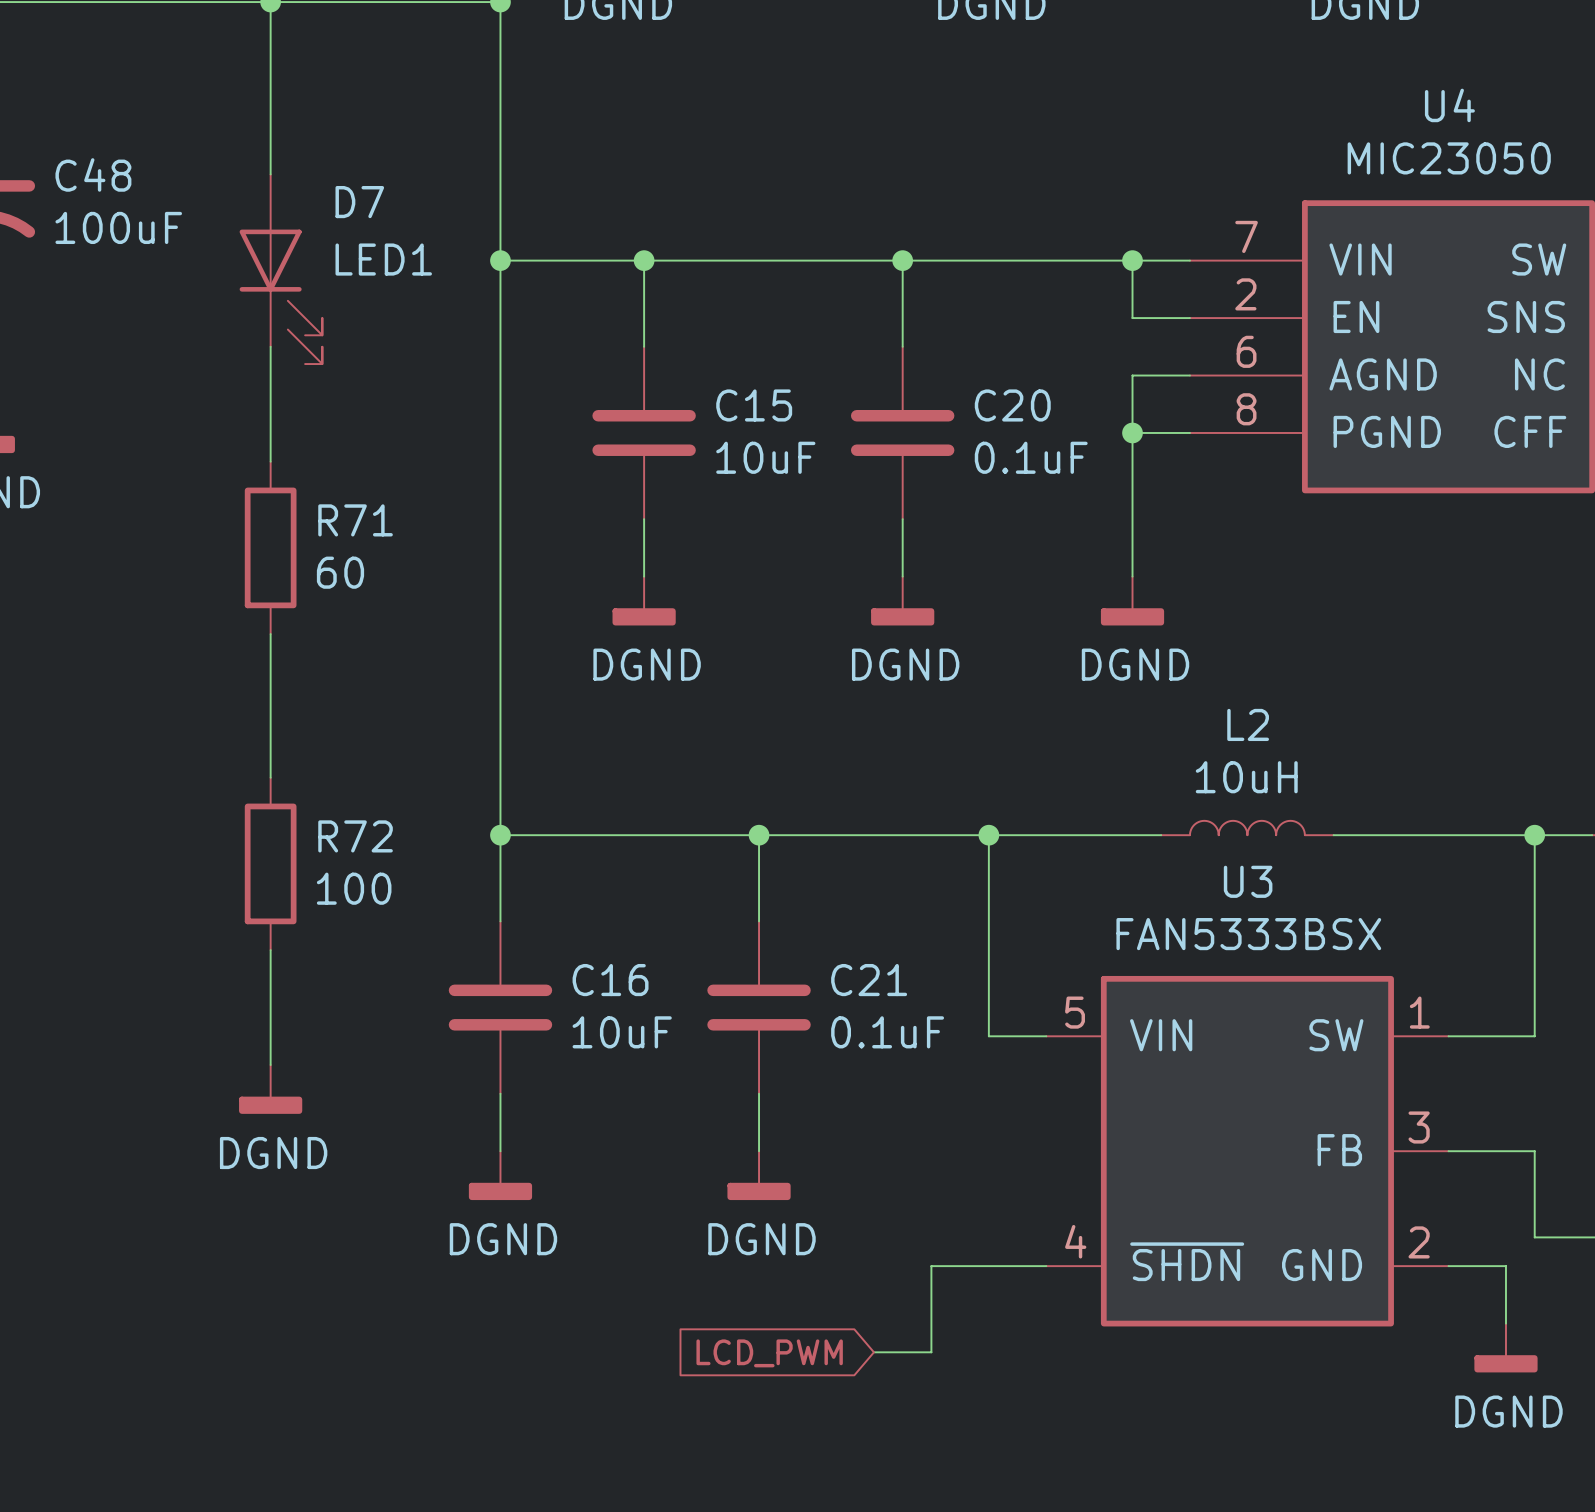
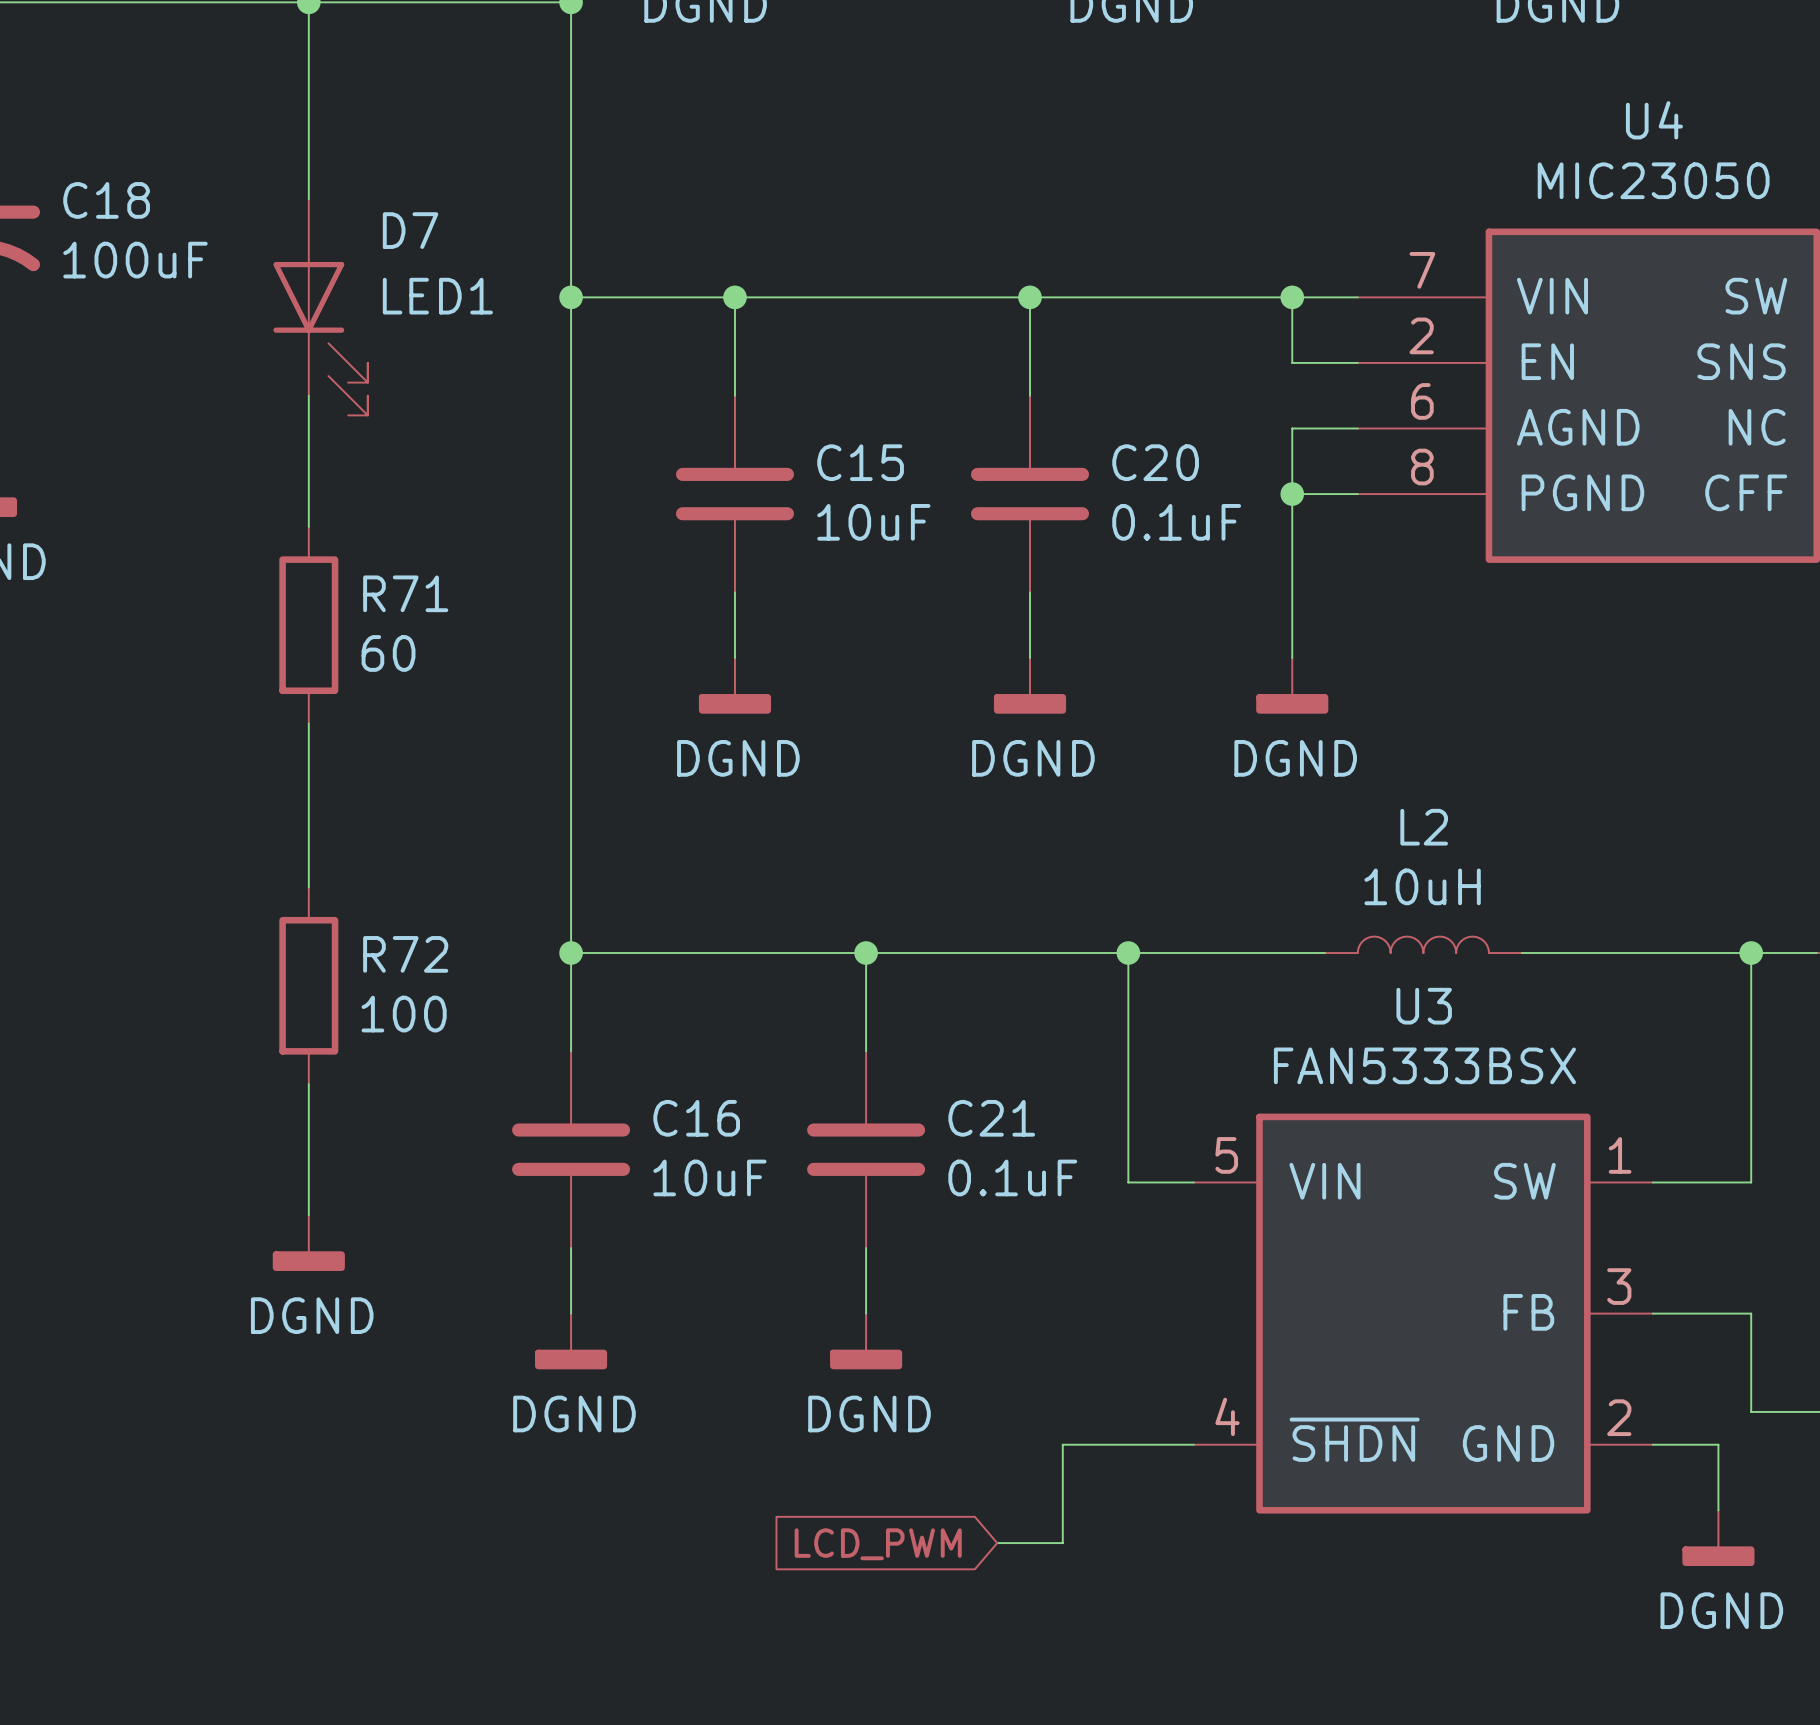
C48 name: C48 (93, 174) -> C18 (106, 200)

